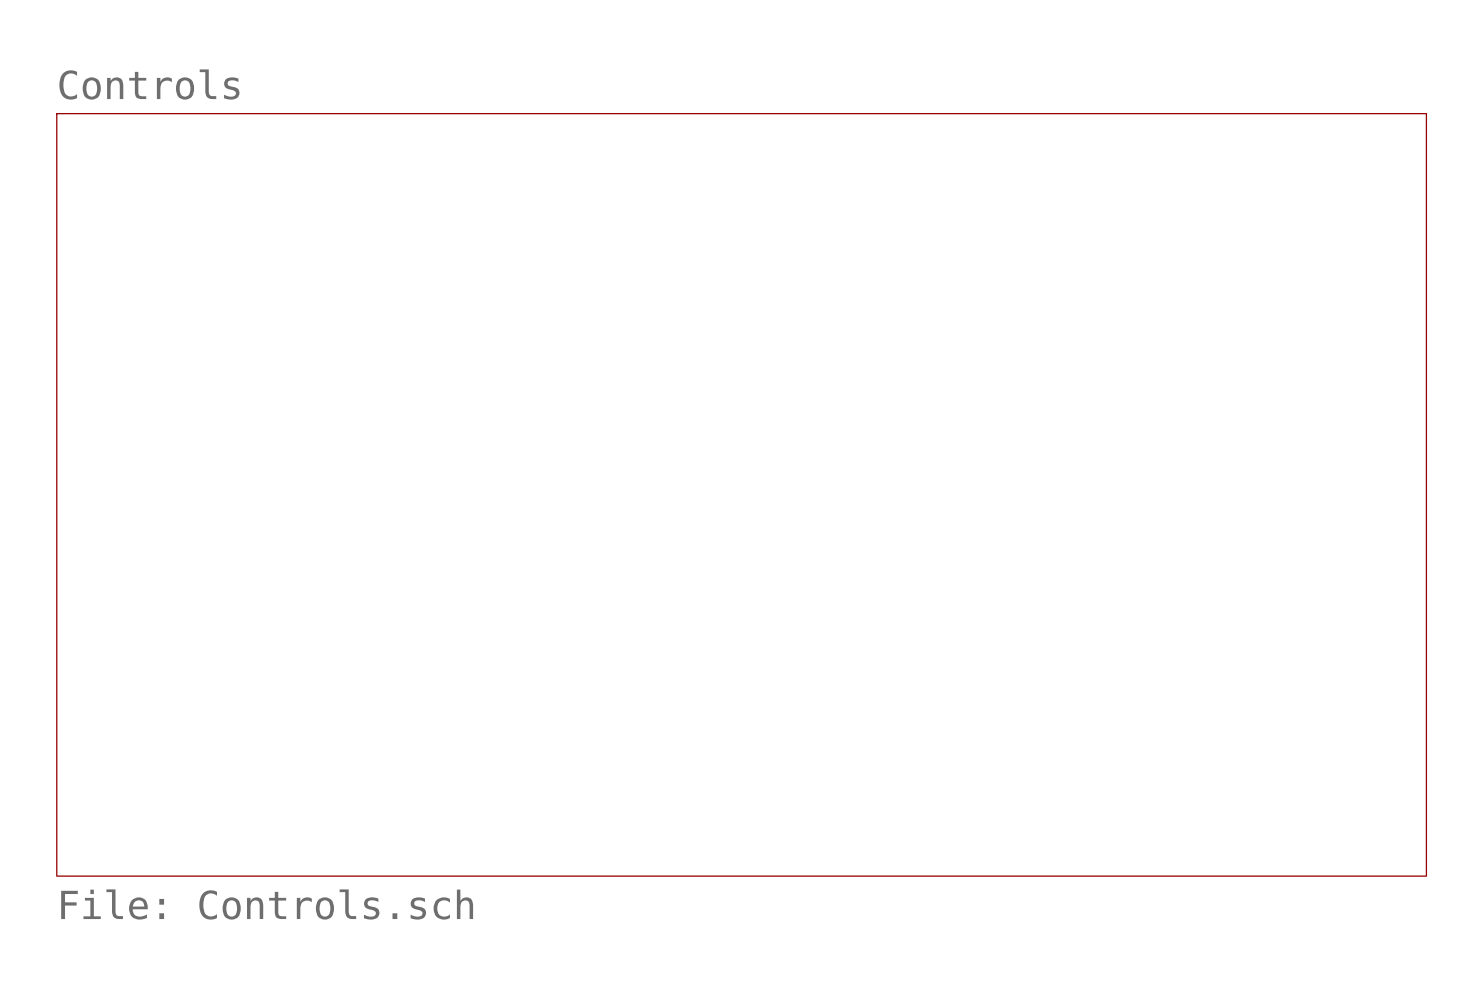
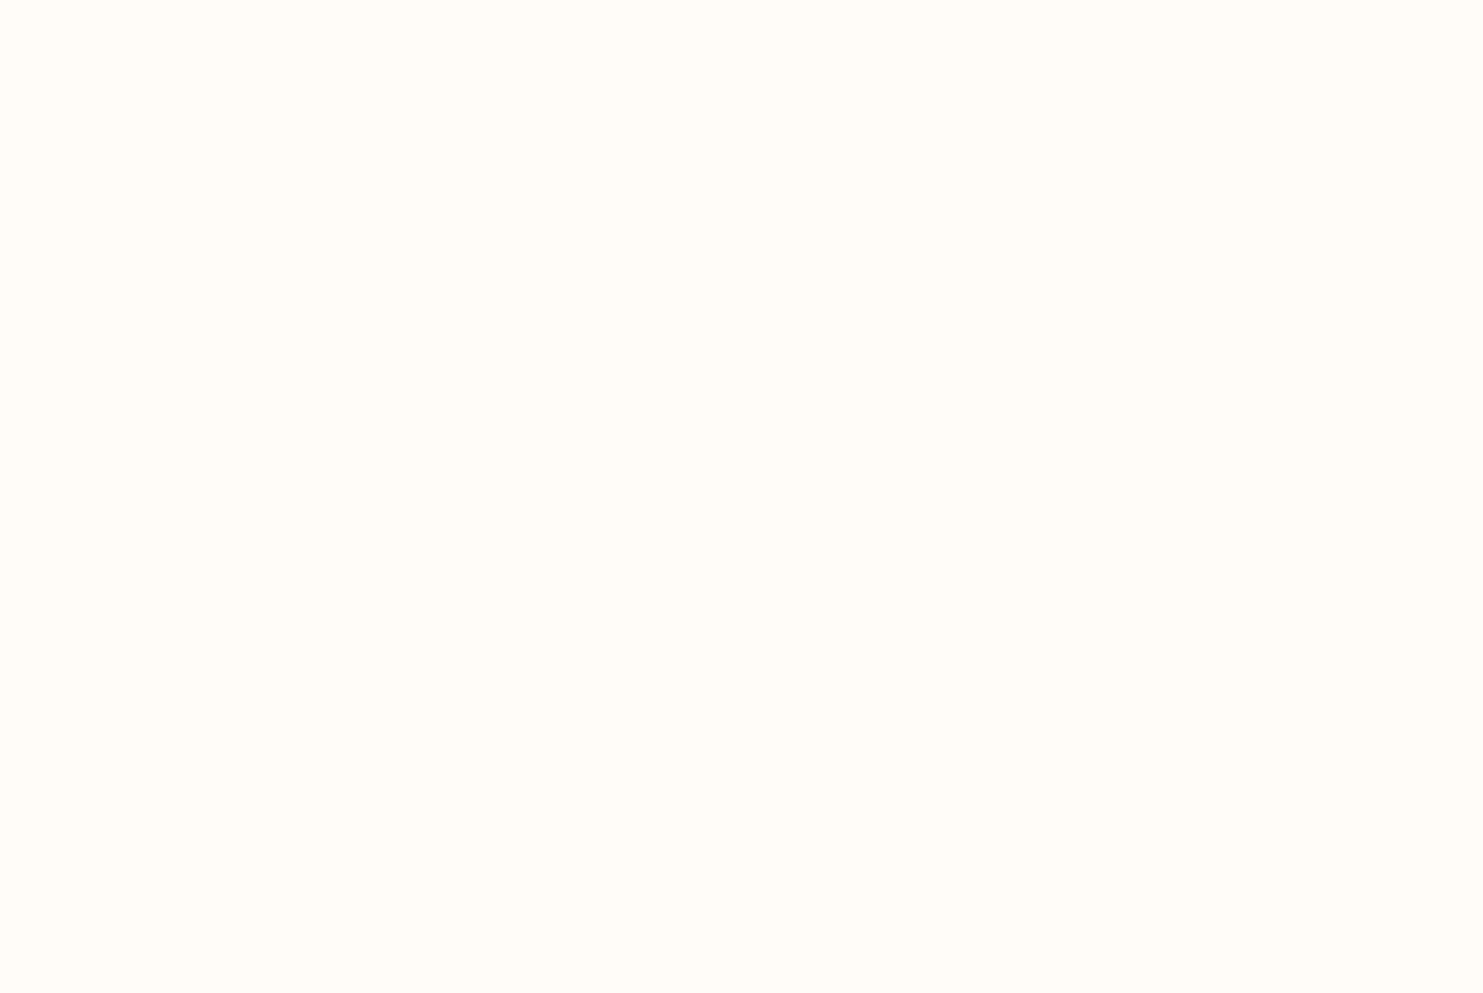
sheet Controls: File: Controls.sch (741, 494) -> none

